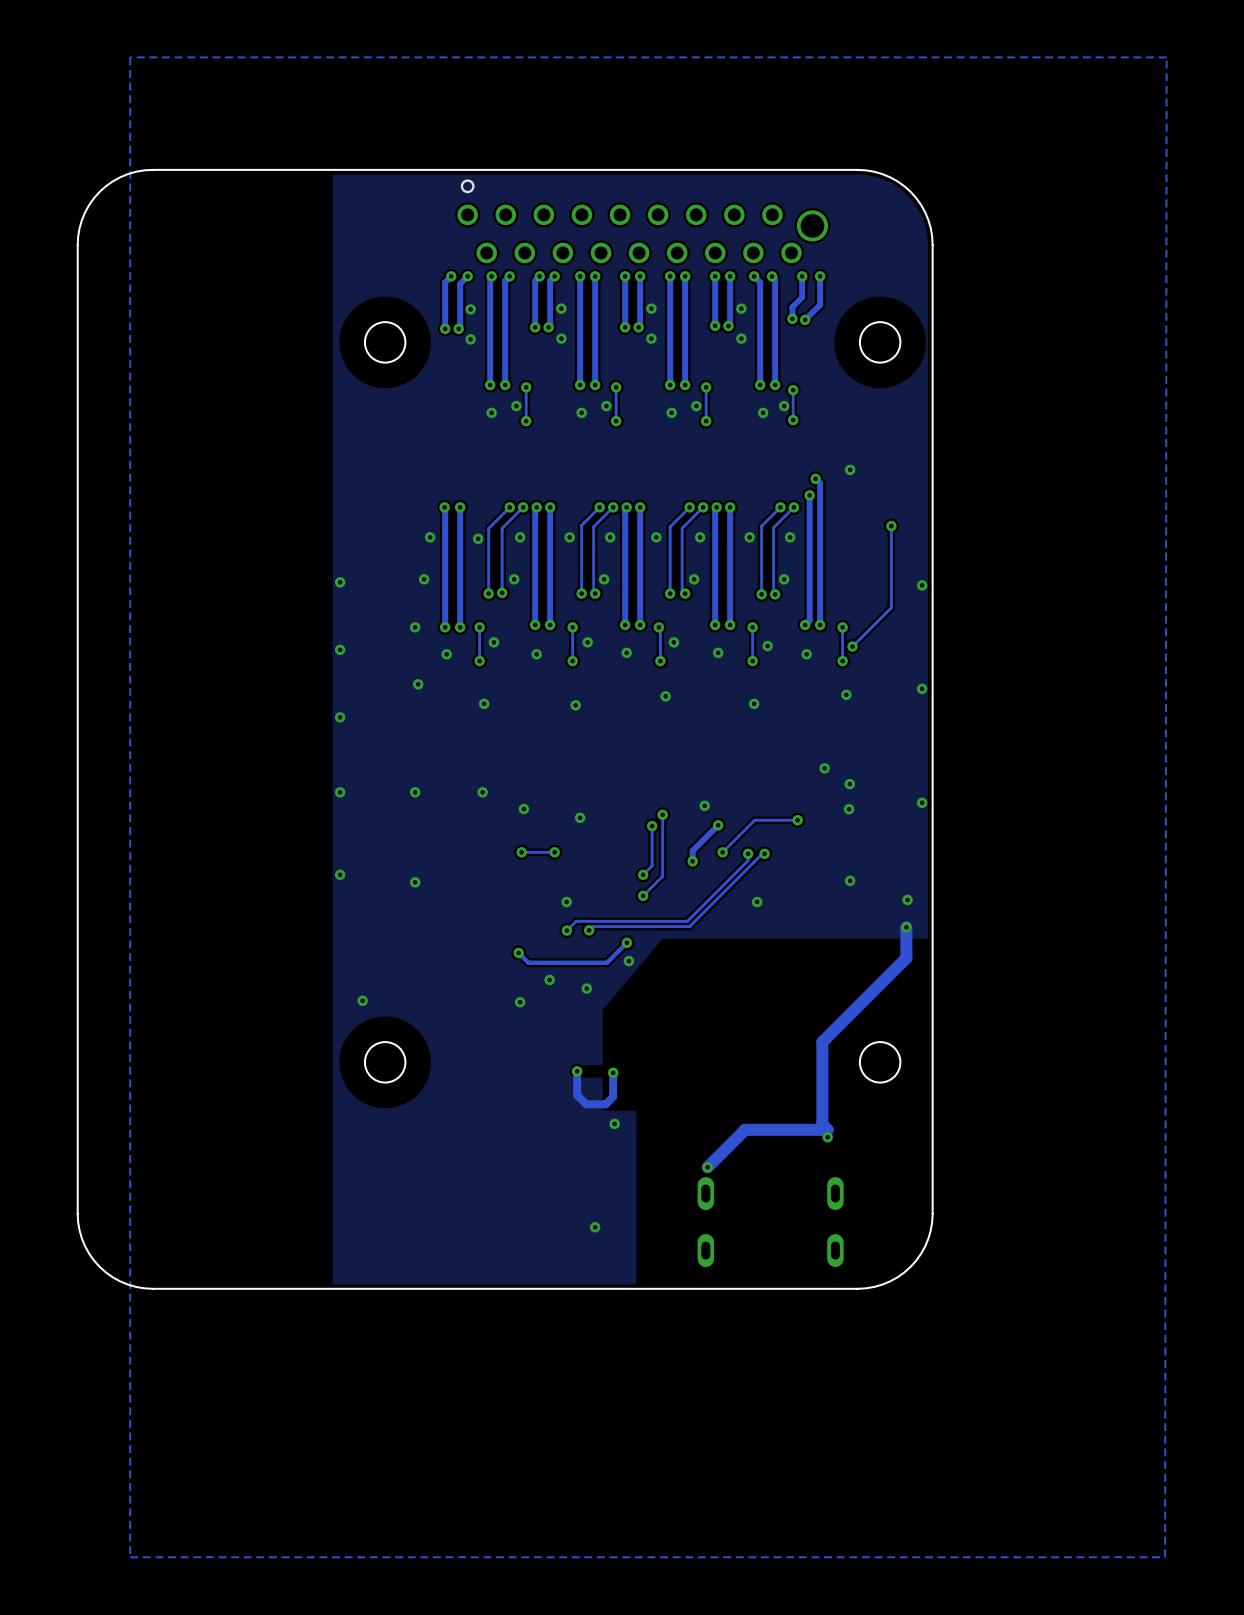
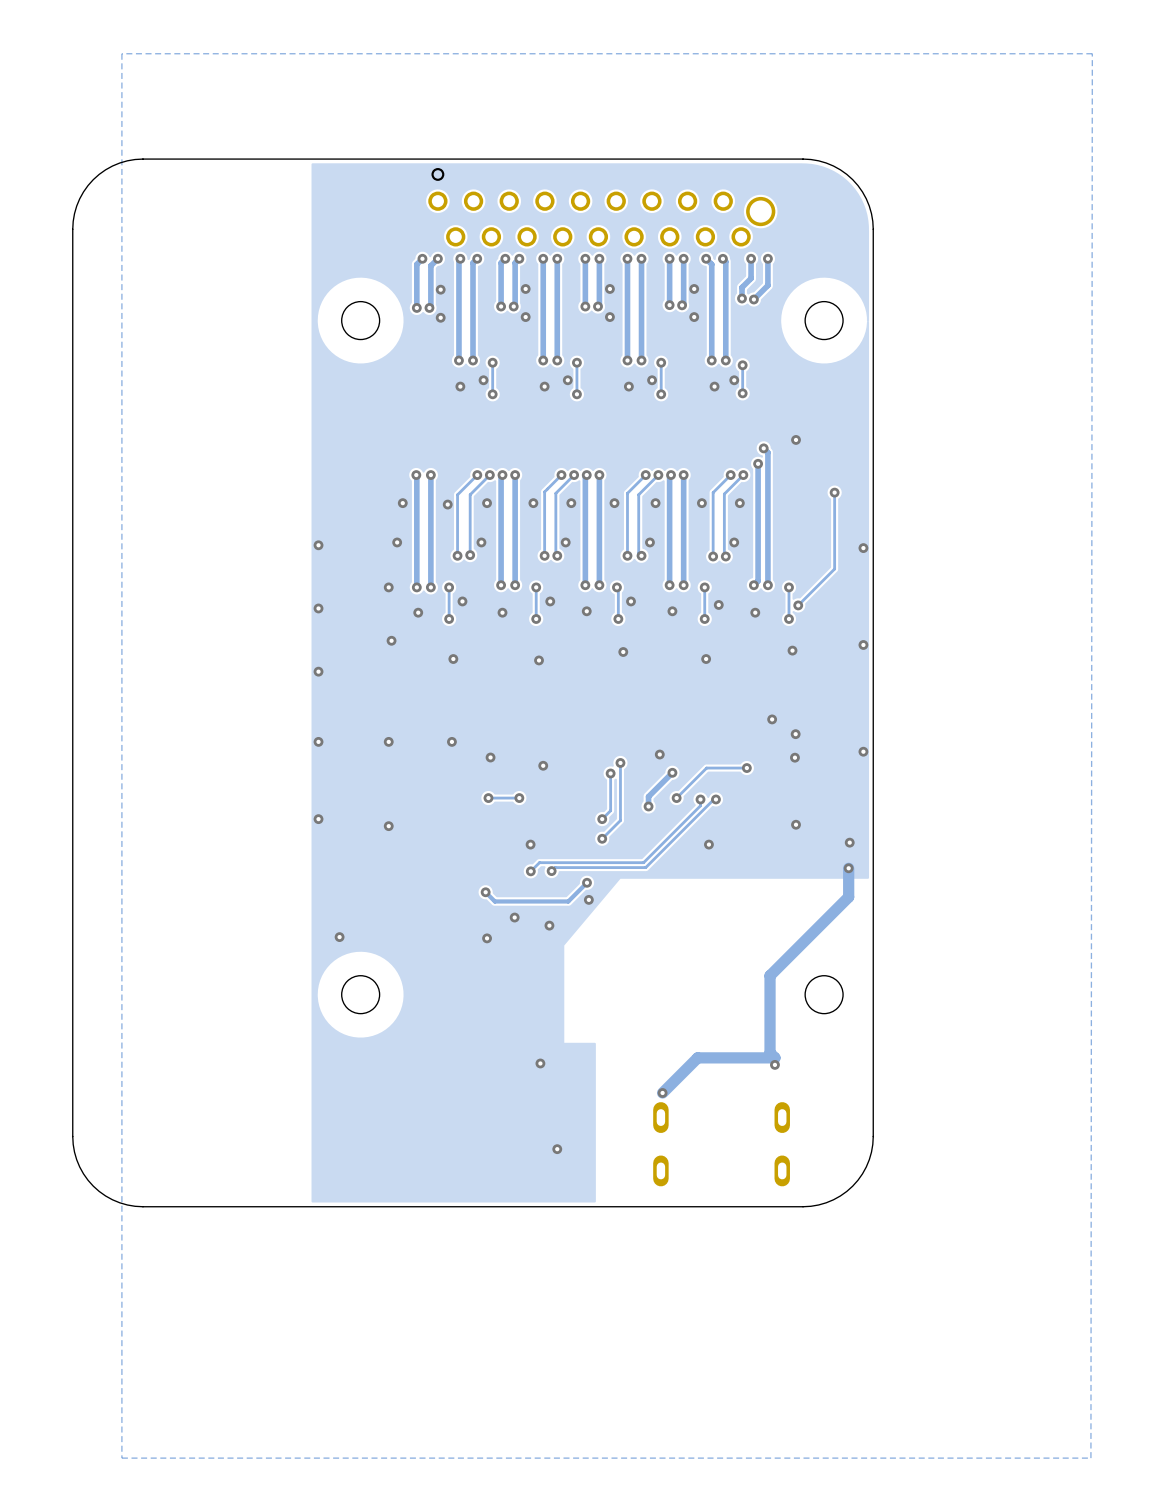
track: (577, 1071) (577, 1095) (586, 1104) (605, 1104) (613, 1096) (613, 1072) -> none
via: (577, 1071) -> none
via: (613, 1072) -> none
via: (614, 1123) -> none
via: none -> (540, 1063)

